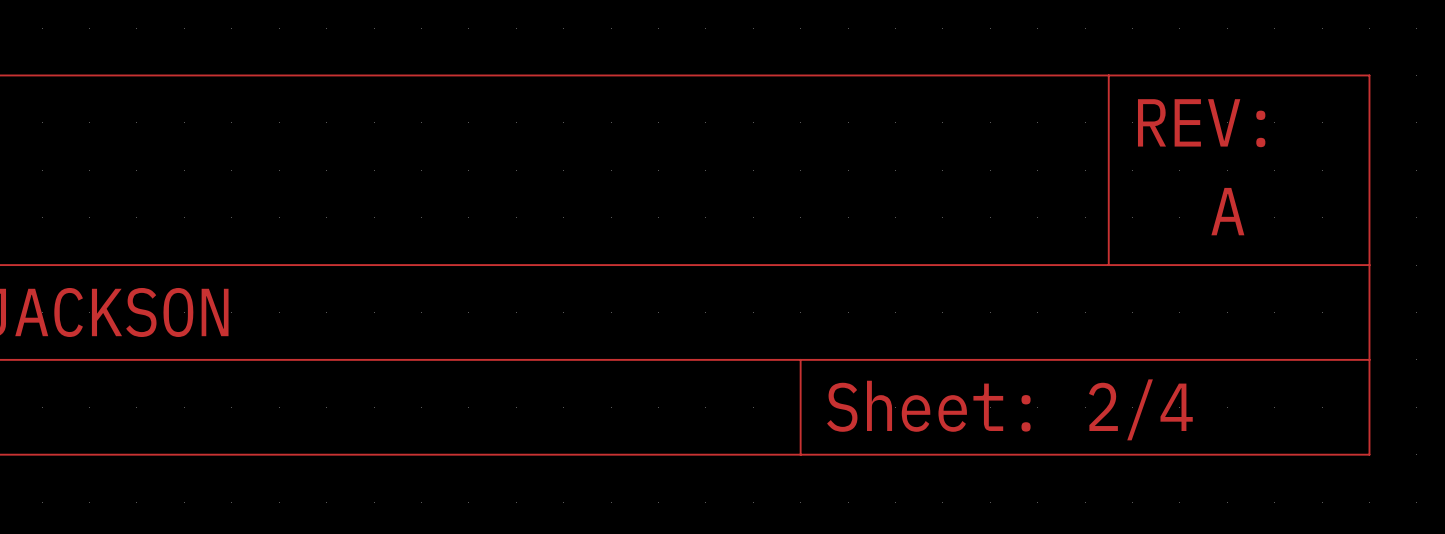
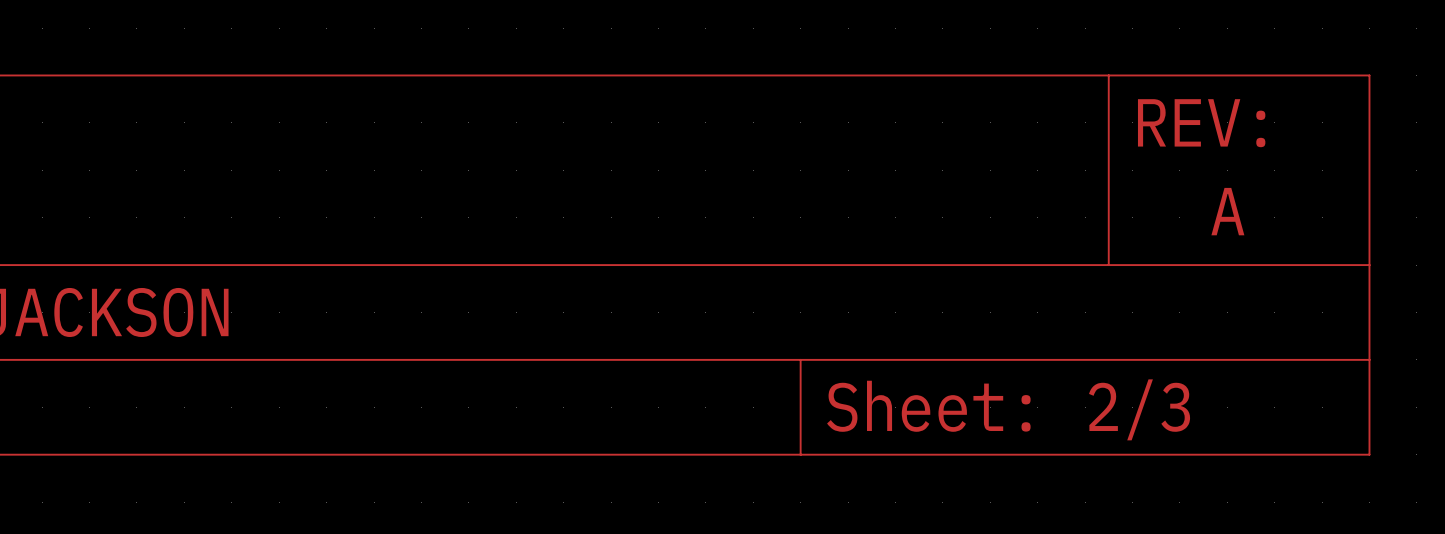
part text: 2/4 (1140, 409) -> 2/3 (1139, 409)

